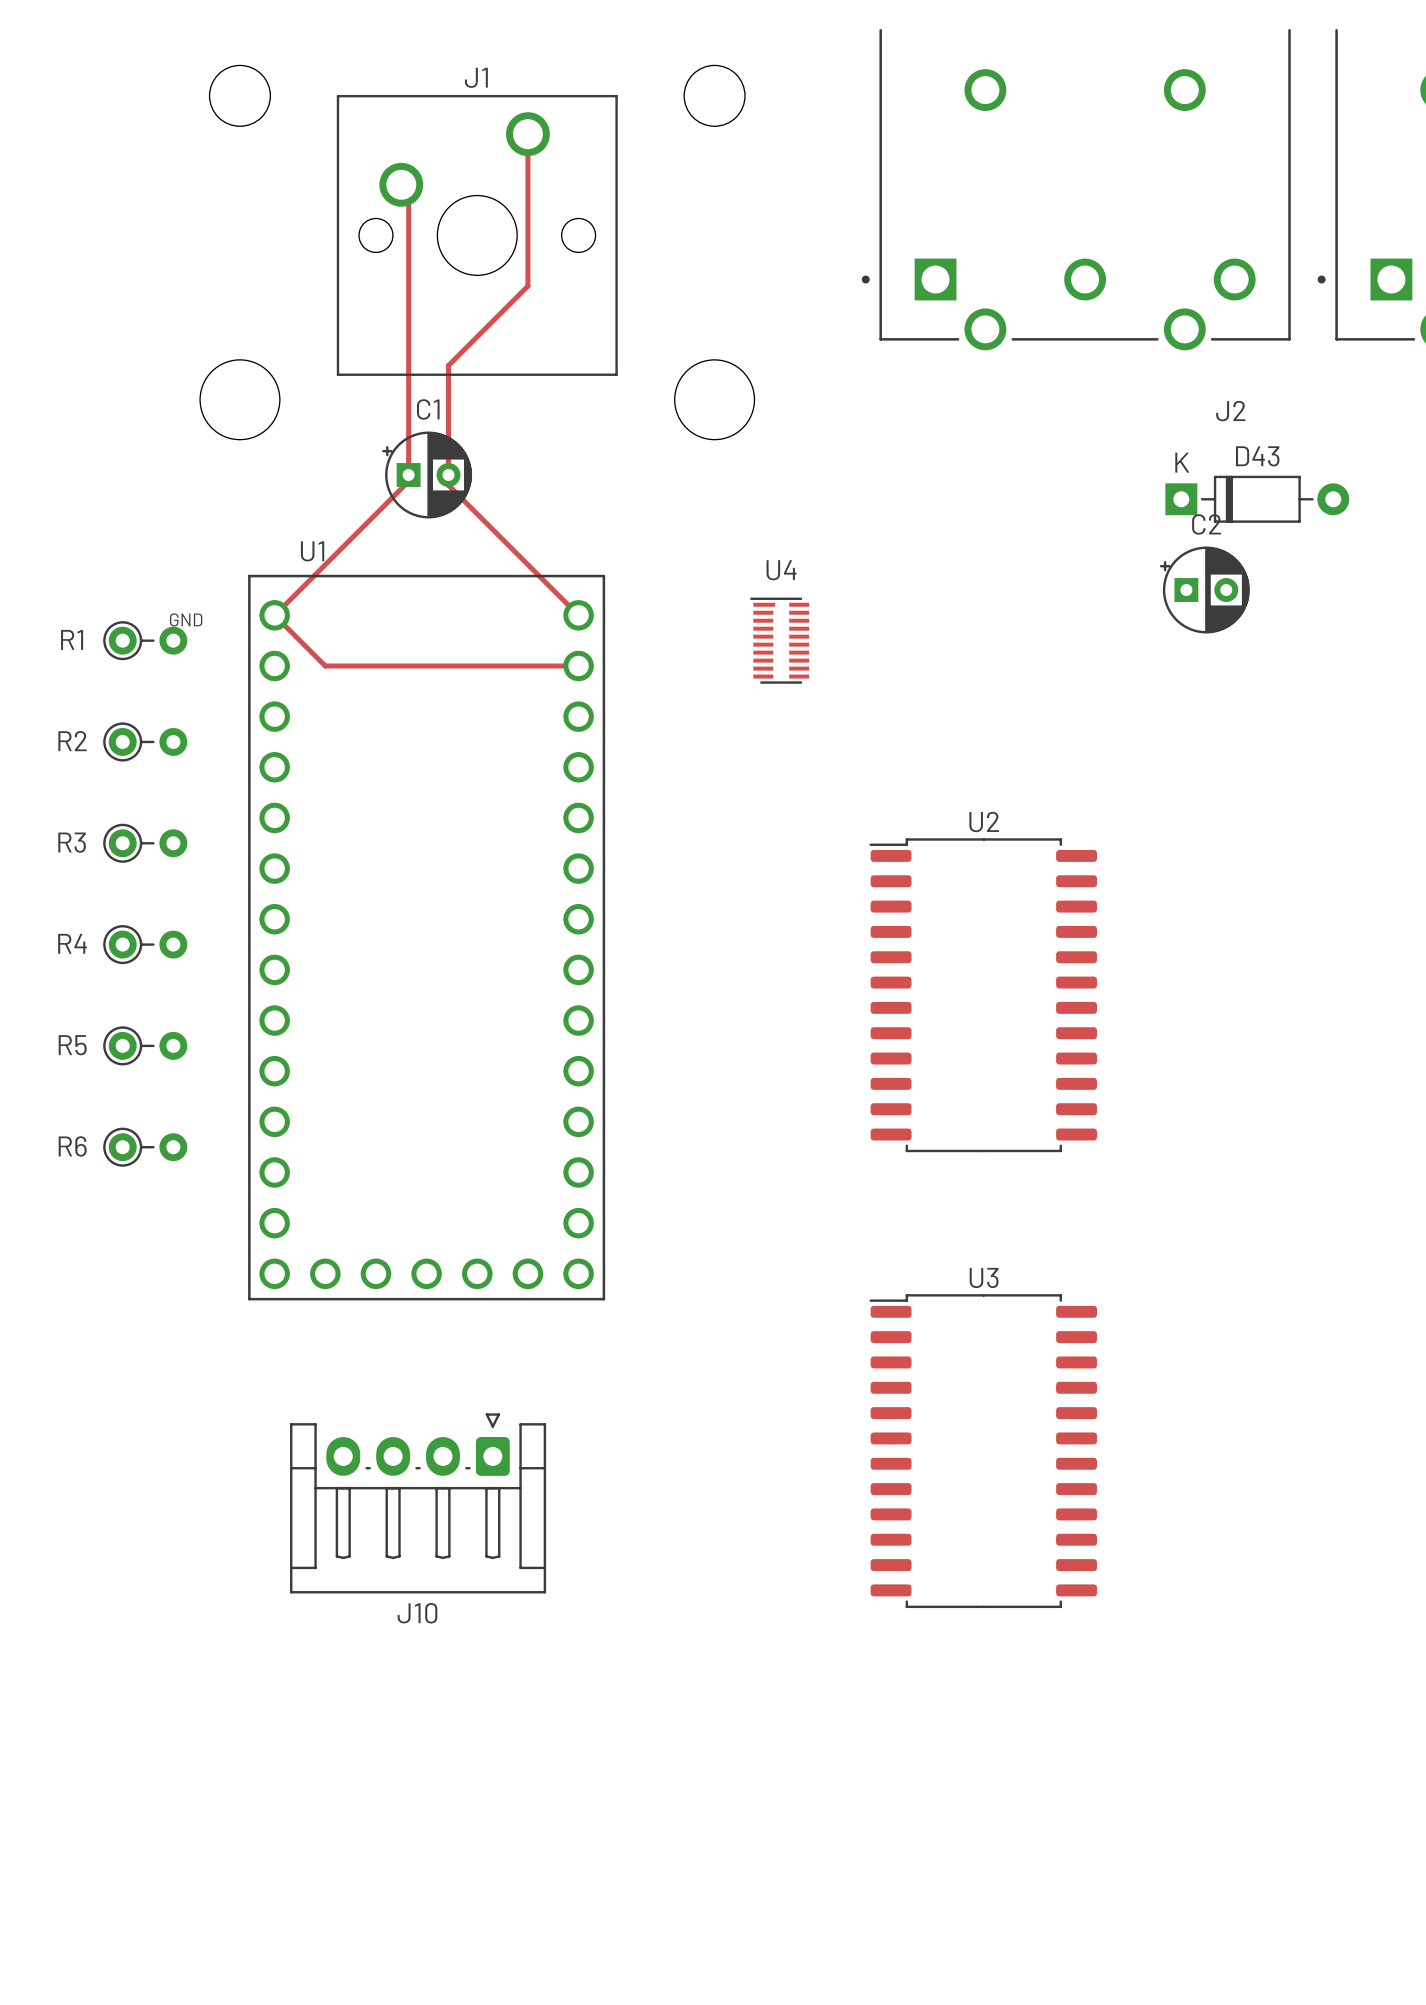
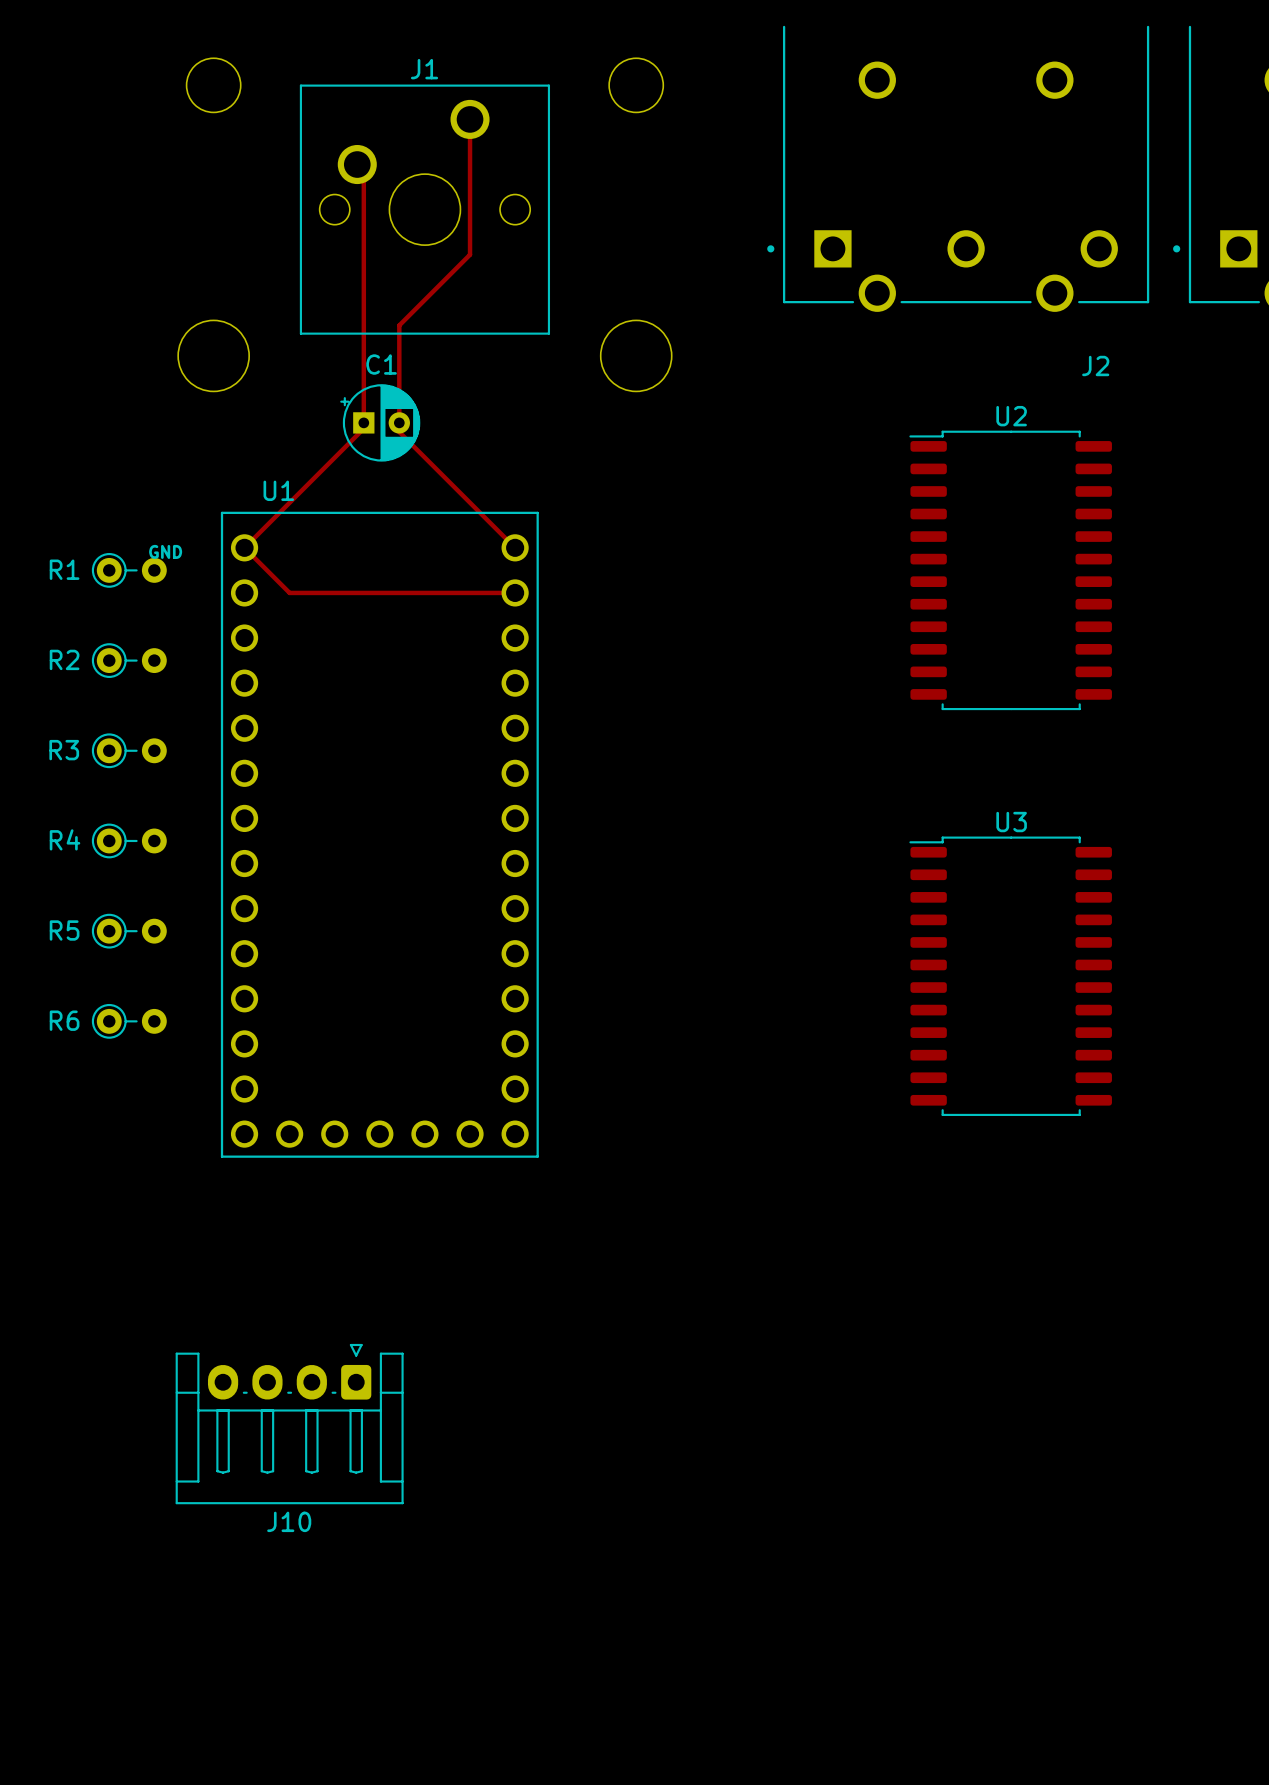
D43: (1257, 499) -> none
C2: (1204, 590) -> none
U4: (779, 640) -> none
U2 position: (983, 995) -> (1010, 570)
U3 position: (983, 1451) -> (1010, 976)
J10 position: (418, 1503) -> (289, 1424)

